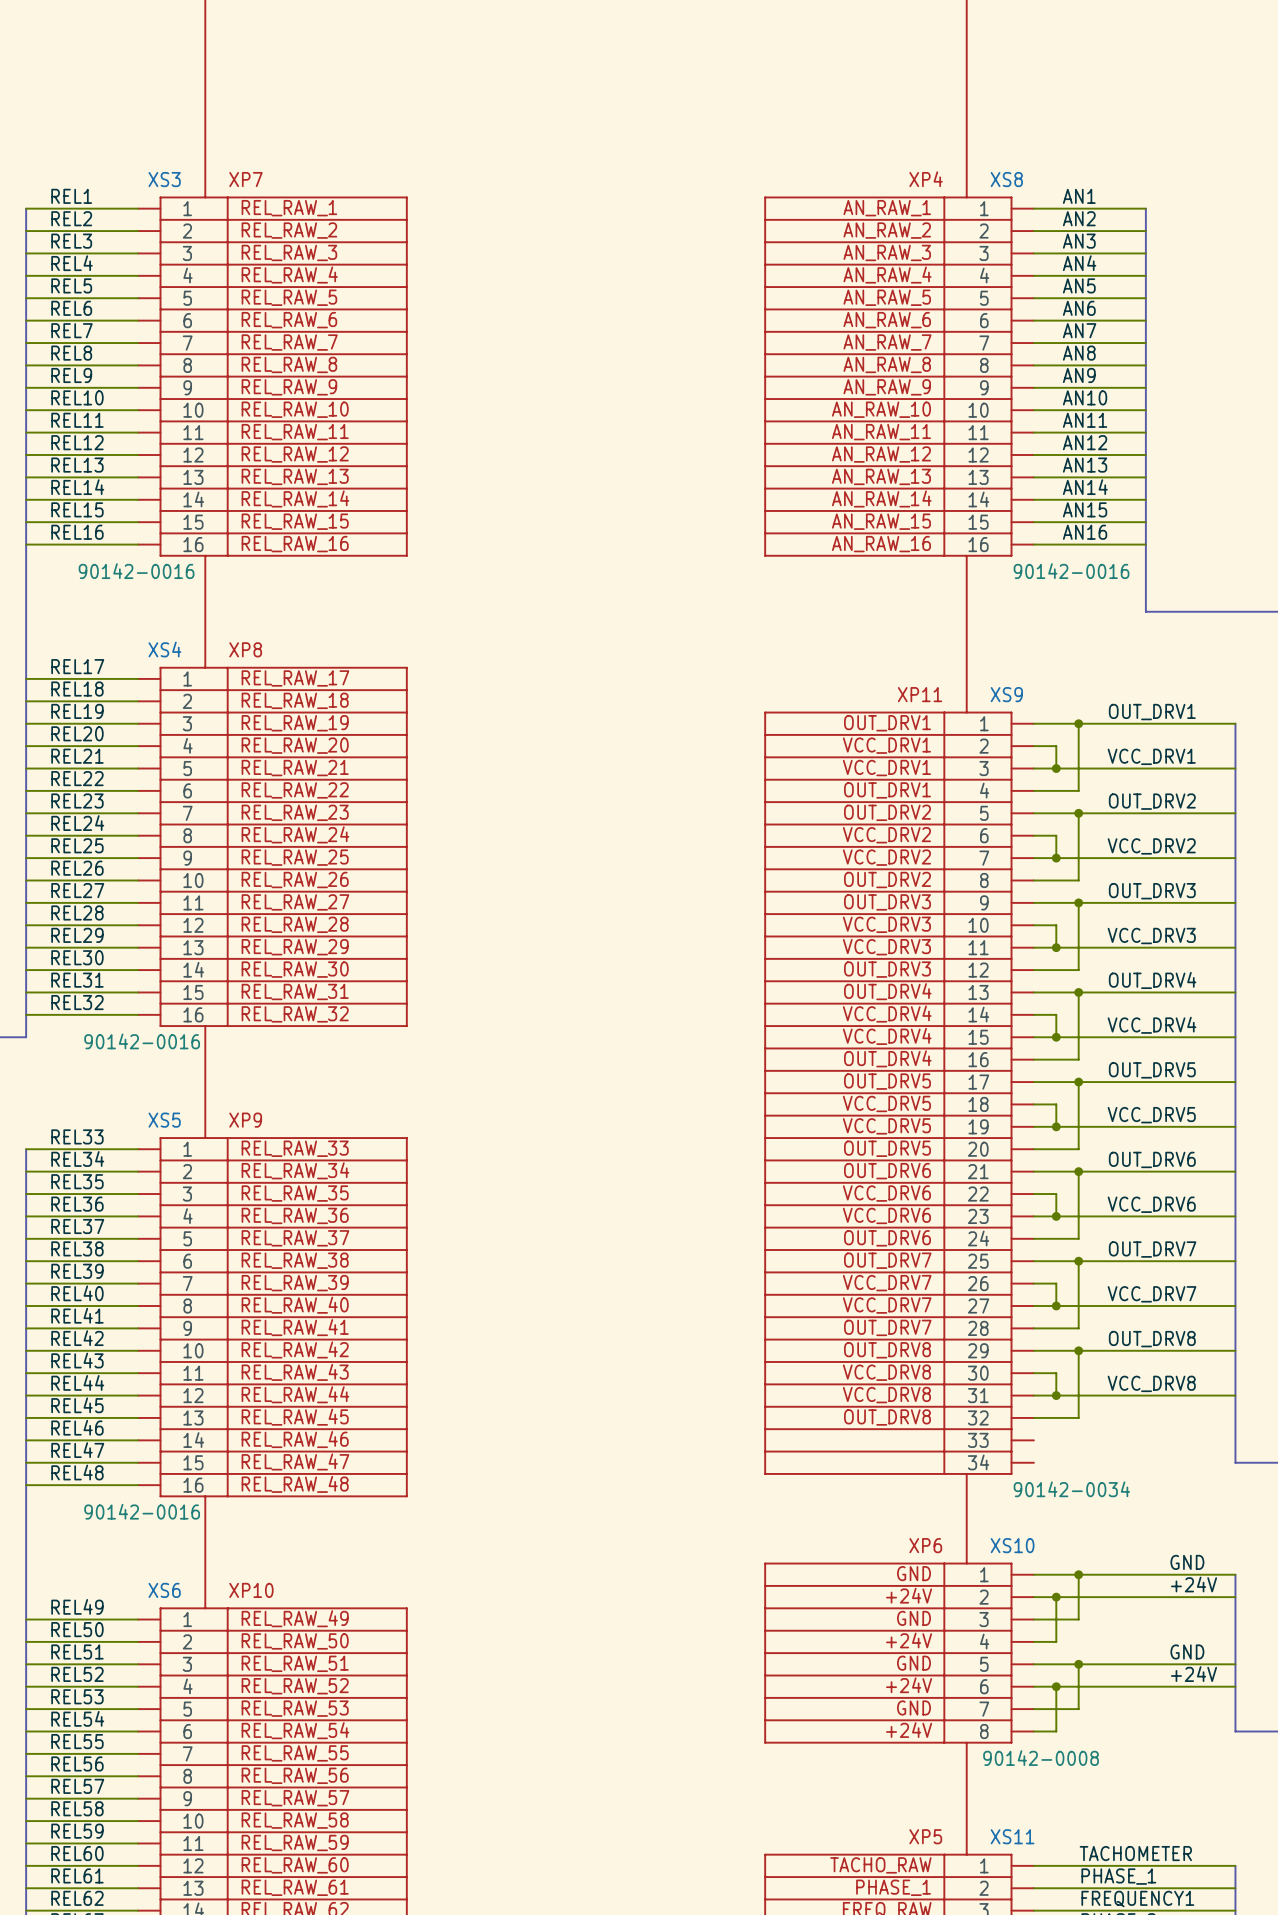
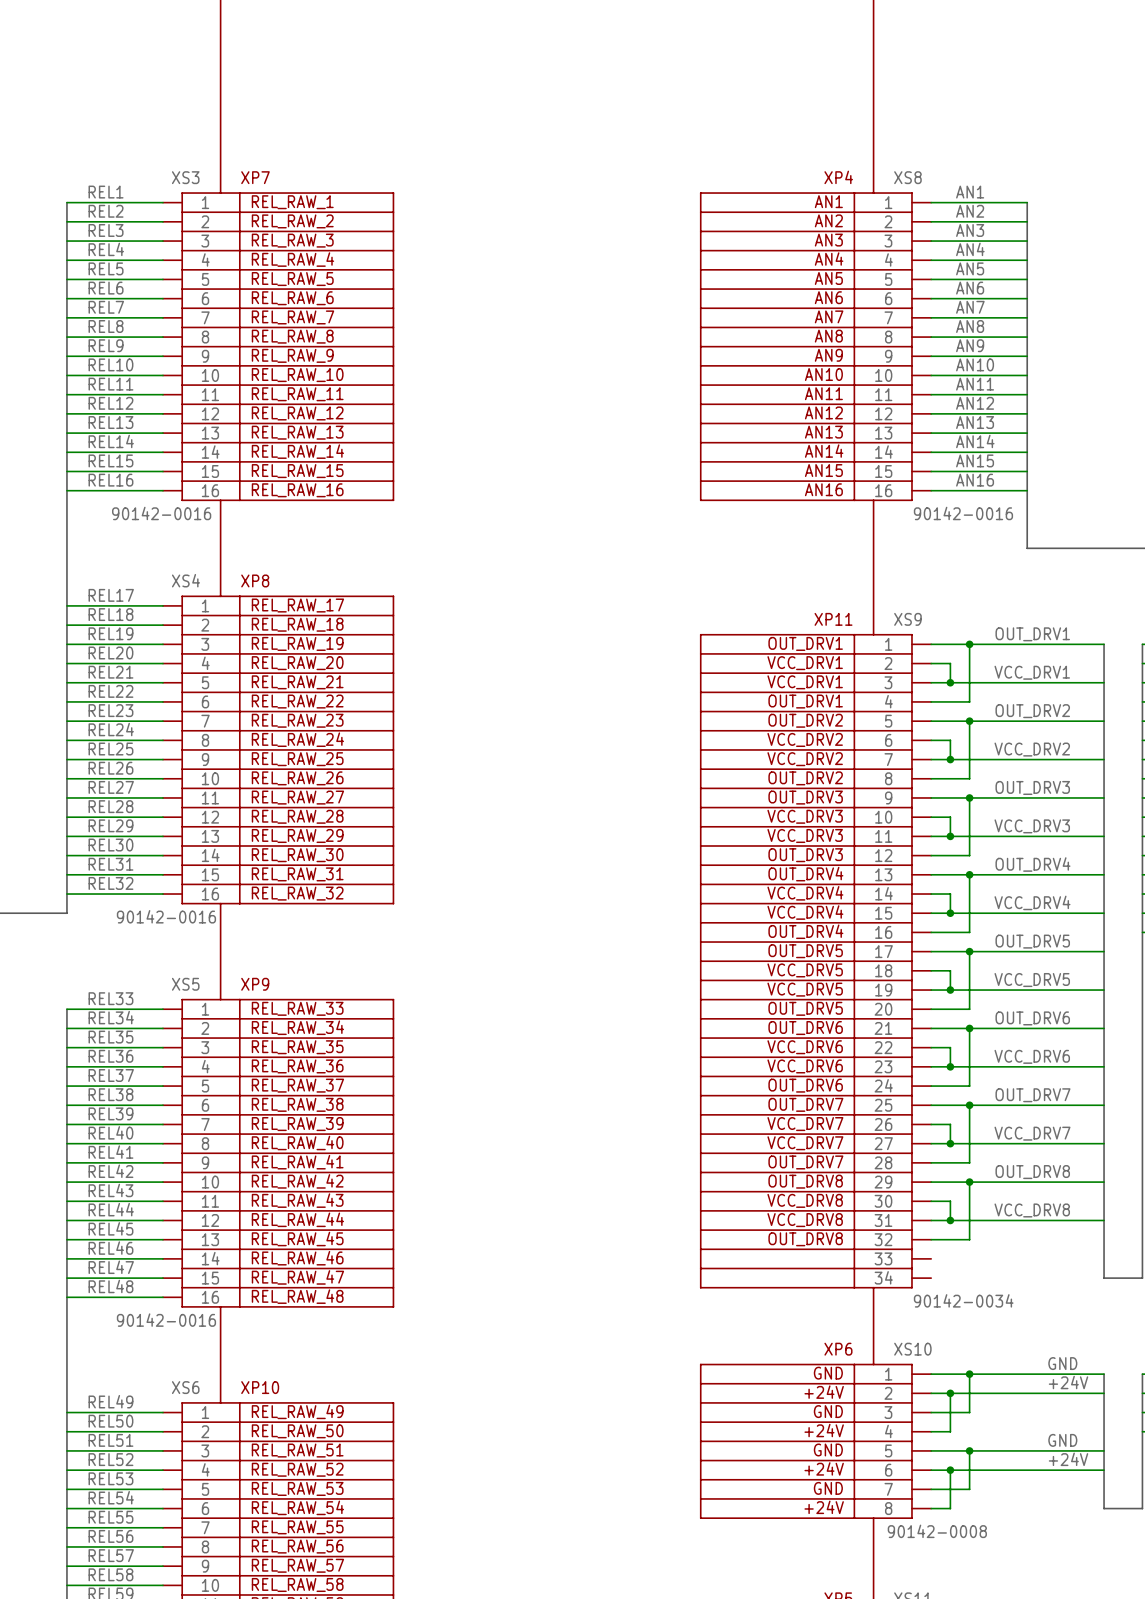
text: AN_RAW_1 (887, 208) -> AN1 (828, 201)
text: AN_RAW_2 (887, 230) -> AN2 (828, 220)
text: AN_RAW_3 (887, 252) -> AN3 (828, 240)
text: AN_RAW_4 (887, 275) -> AN4 (829, 259)
text: AN_RAW_5 (887, 297) -> AN5 (828, 278)
text: AN_RAW_6 (887, 320) -> AN6 (828, 297)
text: AN_RAW_7 (887, 342) -> AN7 (829, 316)
text: AN_RAW_8 (887, 364) -> AN8 (828, 336)
text: AN_RAW_9 (887, 387) -> AN9 (828, 355)
text: AN_RAW_10 (881, 409) -> AN10 (823, 374)
text: AN_RAW_11 (881, 432) -> AN11 (823, 393)
text: AN_RAW_12 (881, 454) -> AN12 (823, 412)
text: AN_RAW_13 (881, 476) -> AN13 (823, 432)
text: AN_RAW_14 (881, 498) -> AN14 (824, 451)
text: AN_RAW_15 (881, 521) -> AN15 (823, 470)
text: AN_RAW_16 (881, 544) -> AN16 (823, 489)

